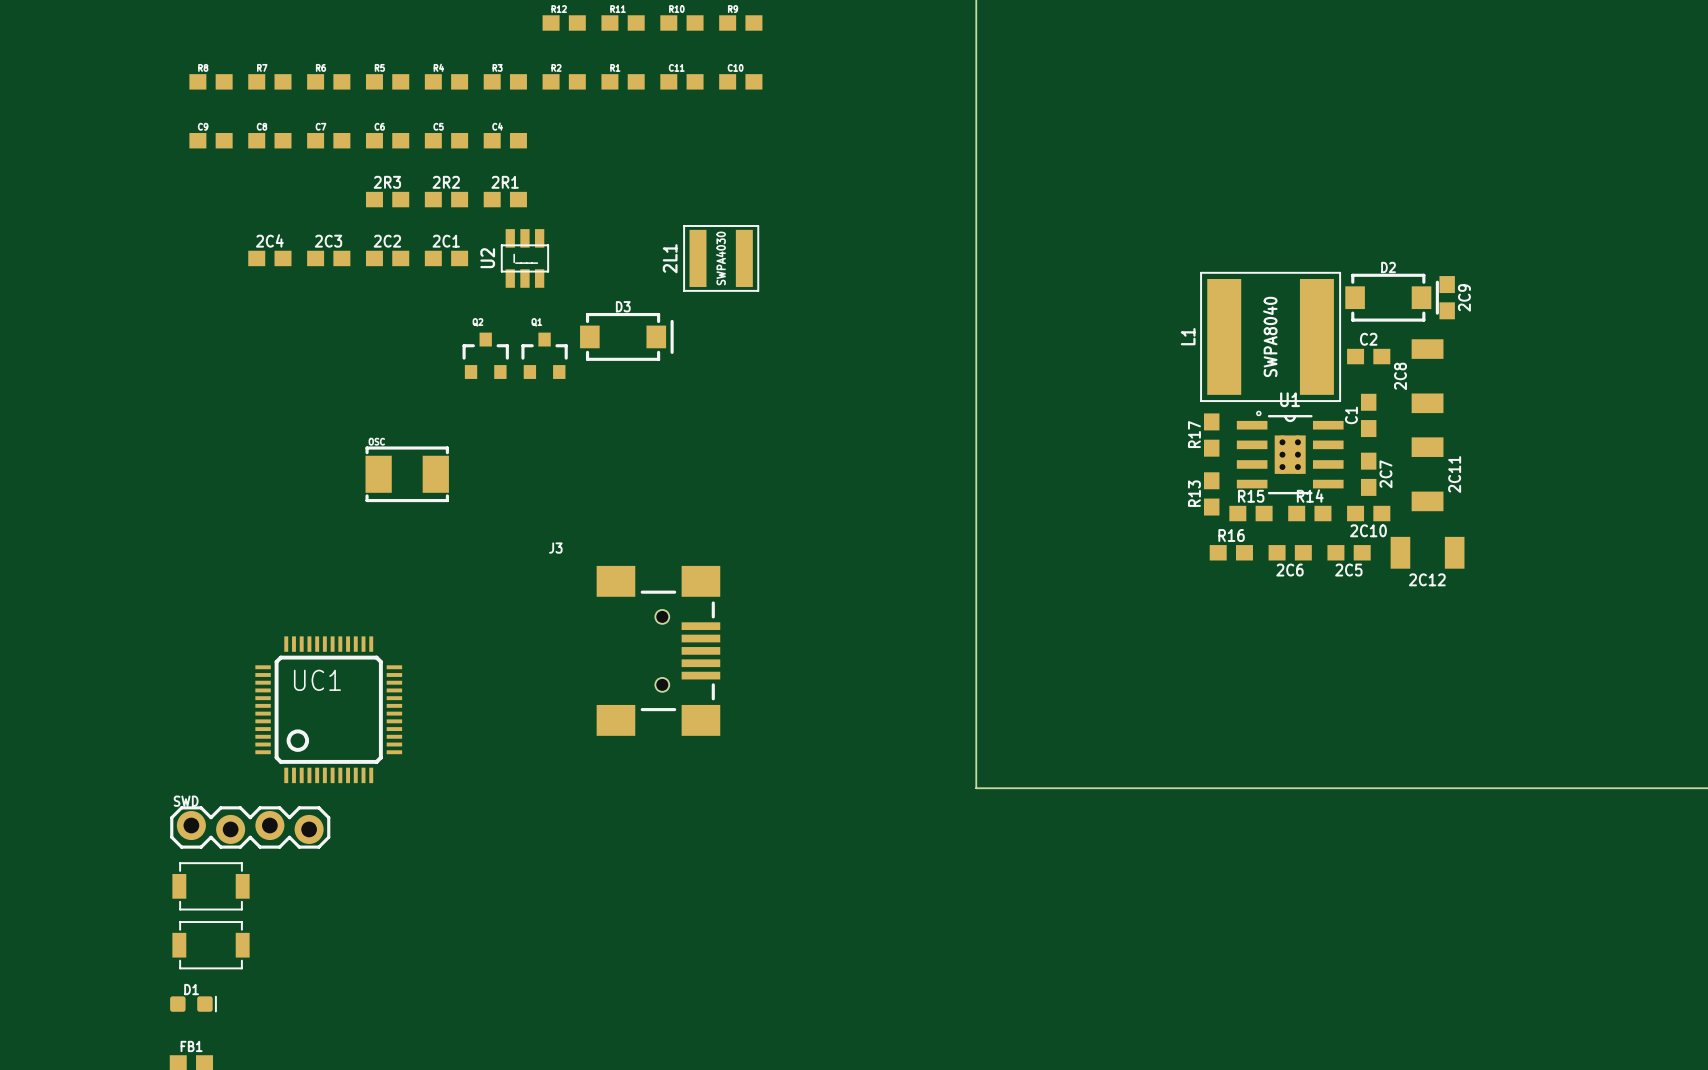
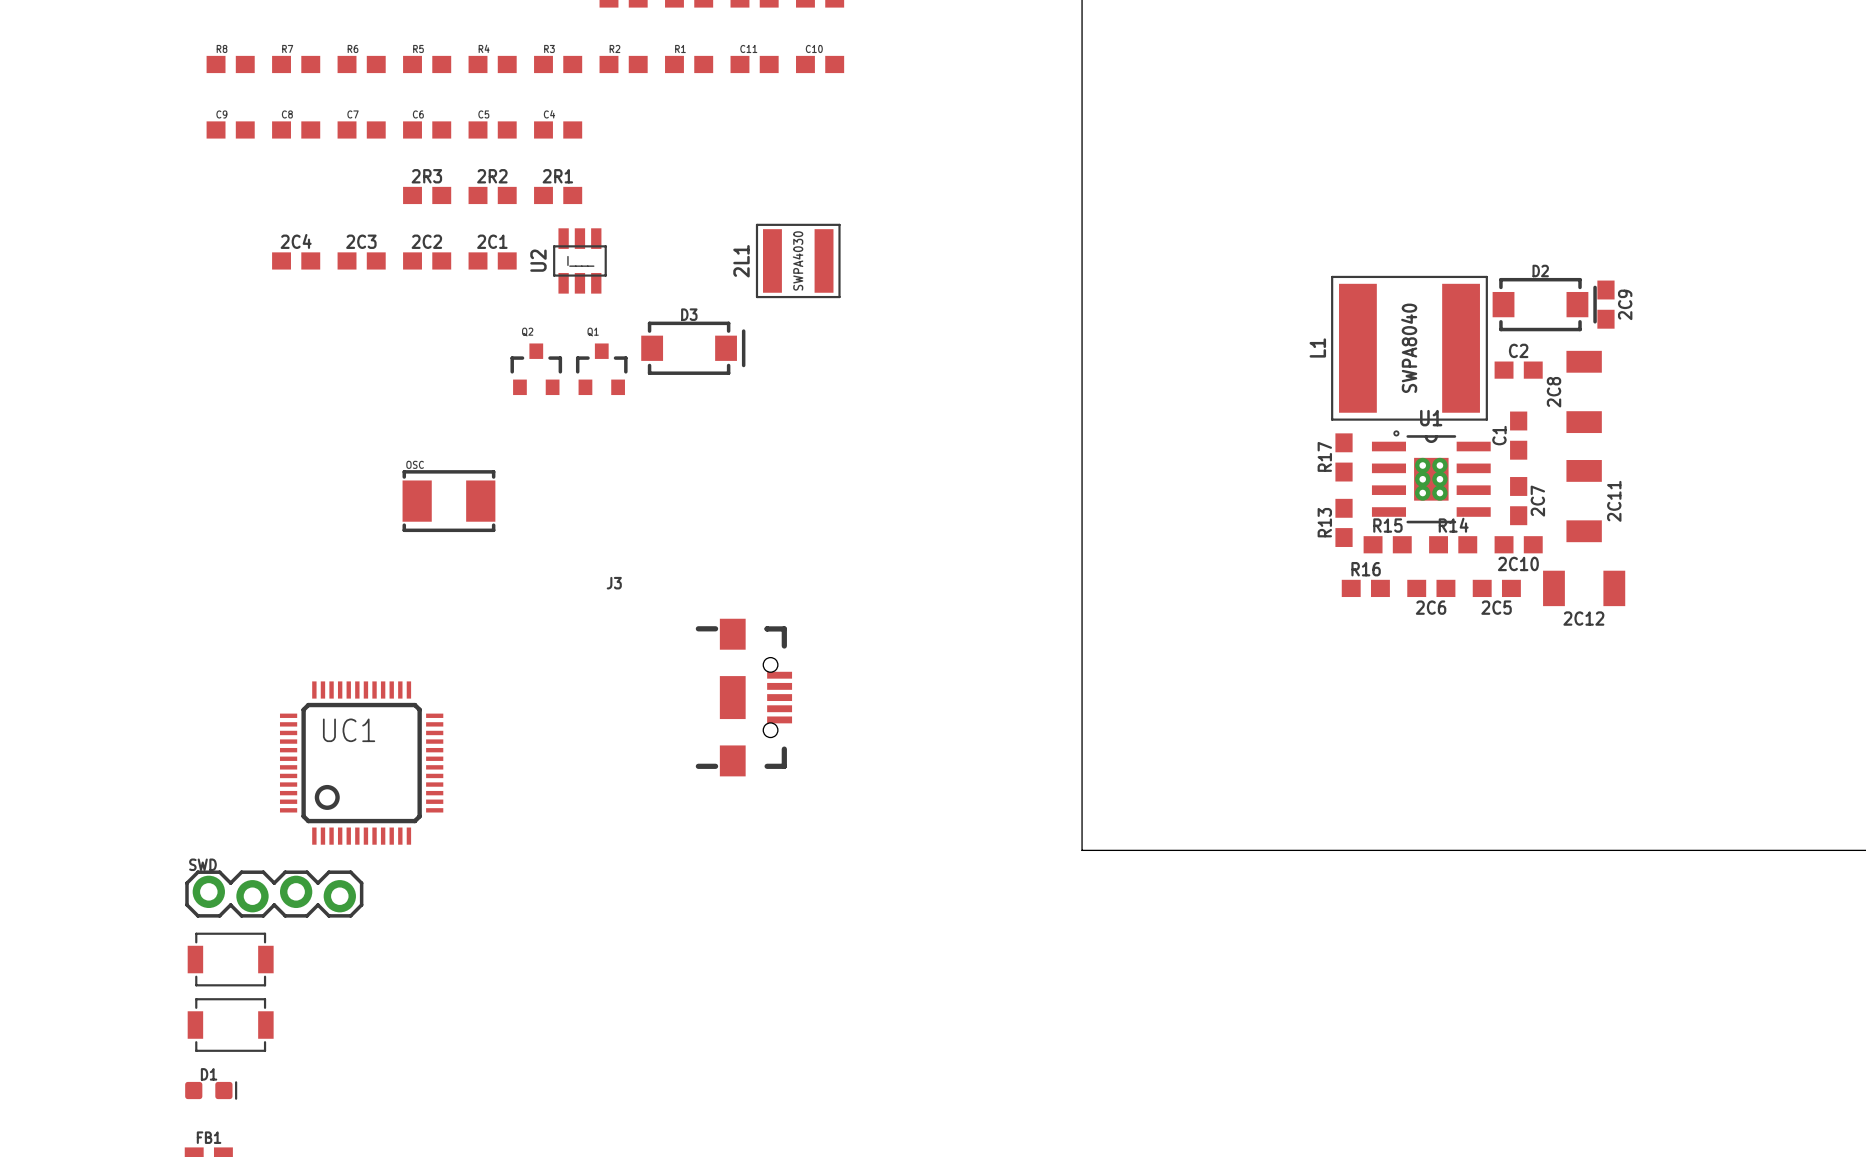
J3 footprint: [596, 565, 721, 736] -> [695, 618, 793, 777]

